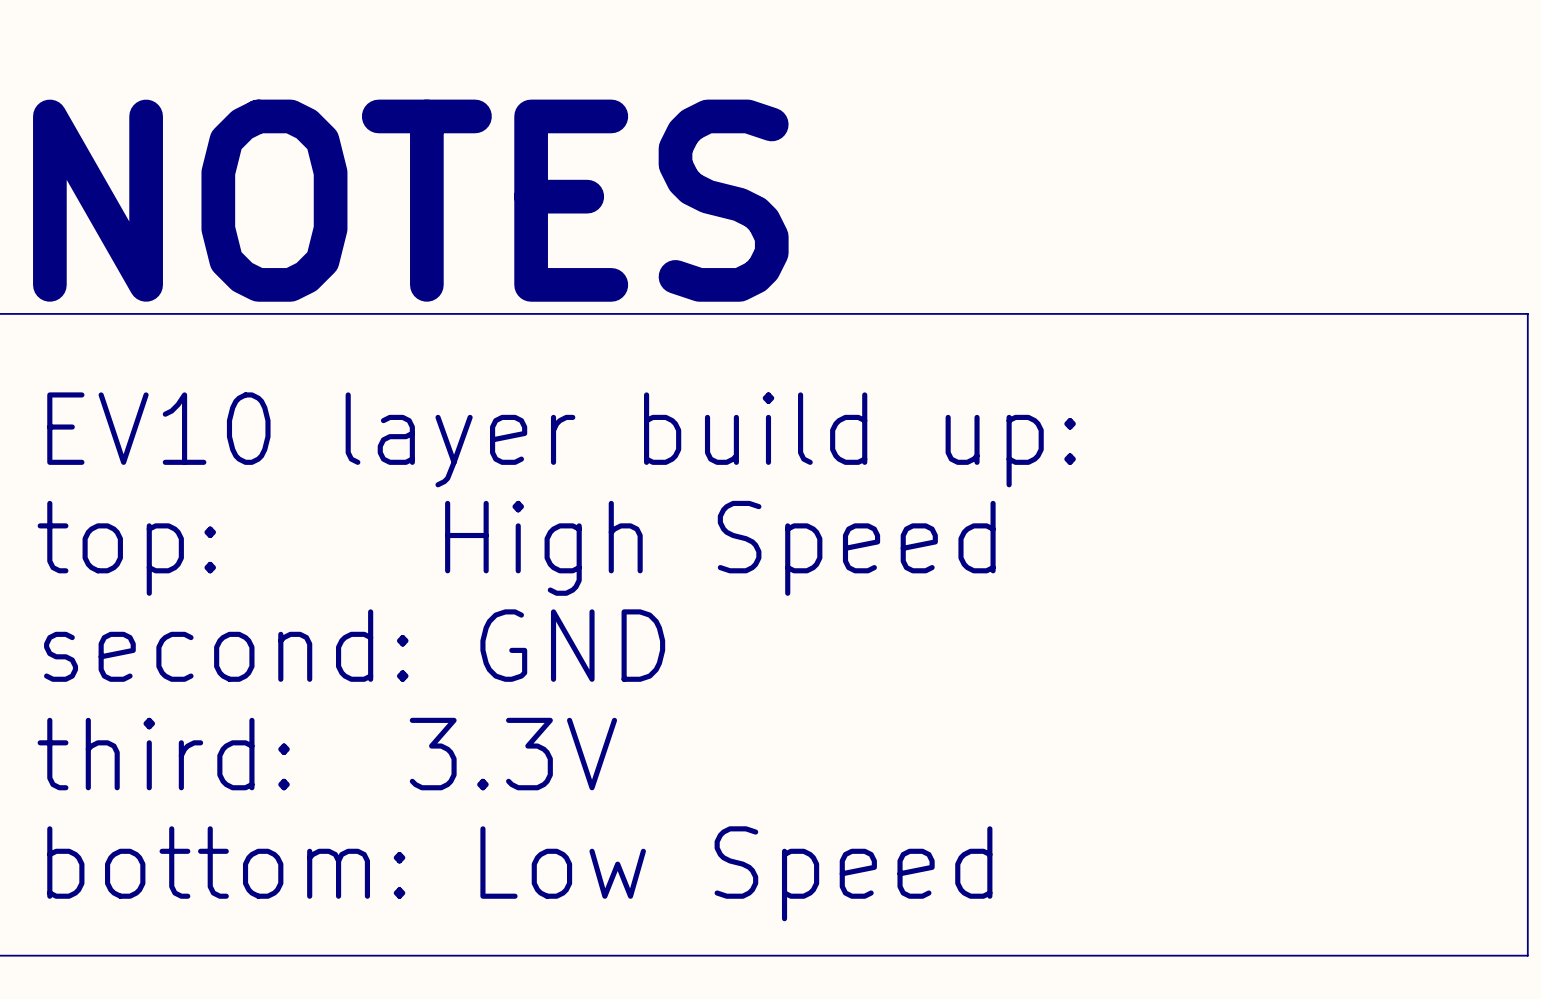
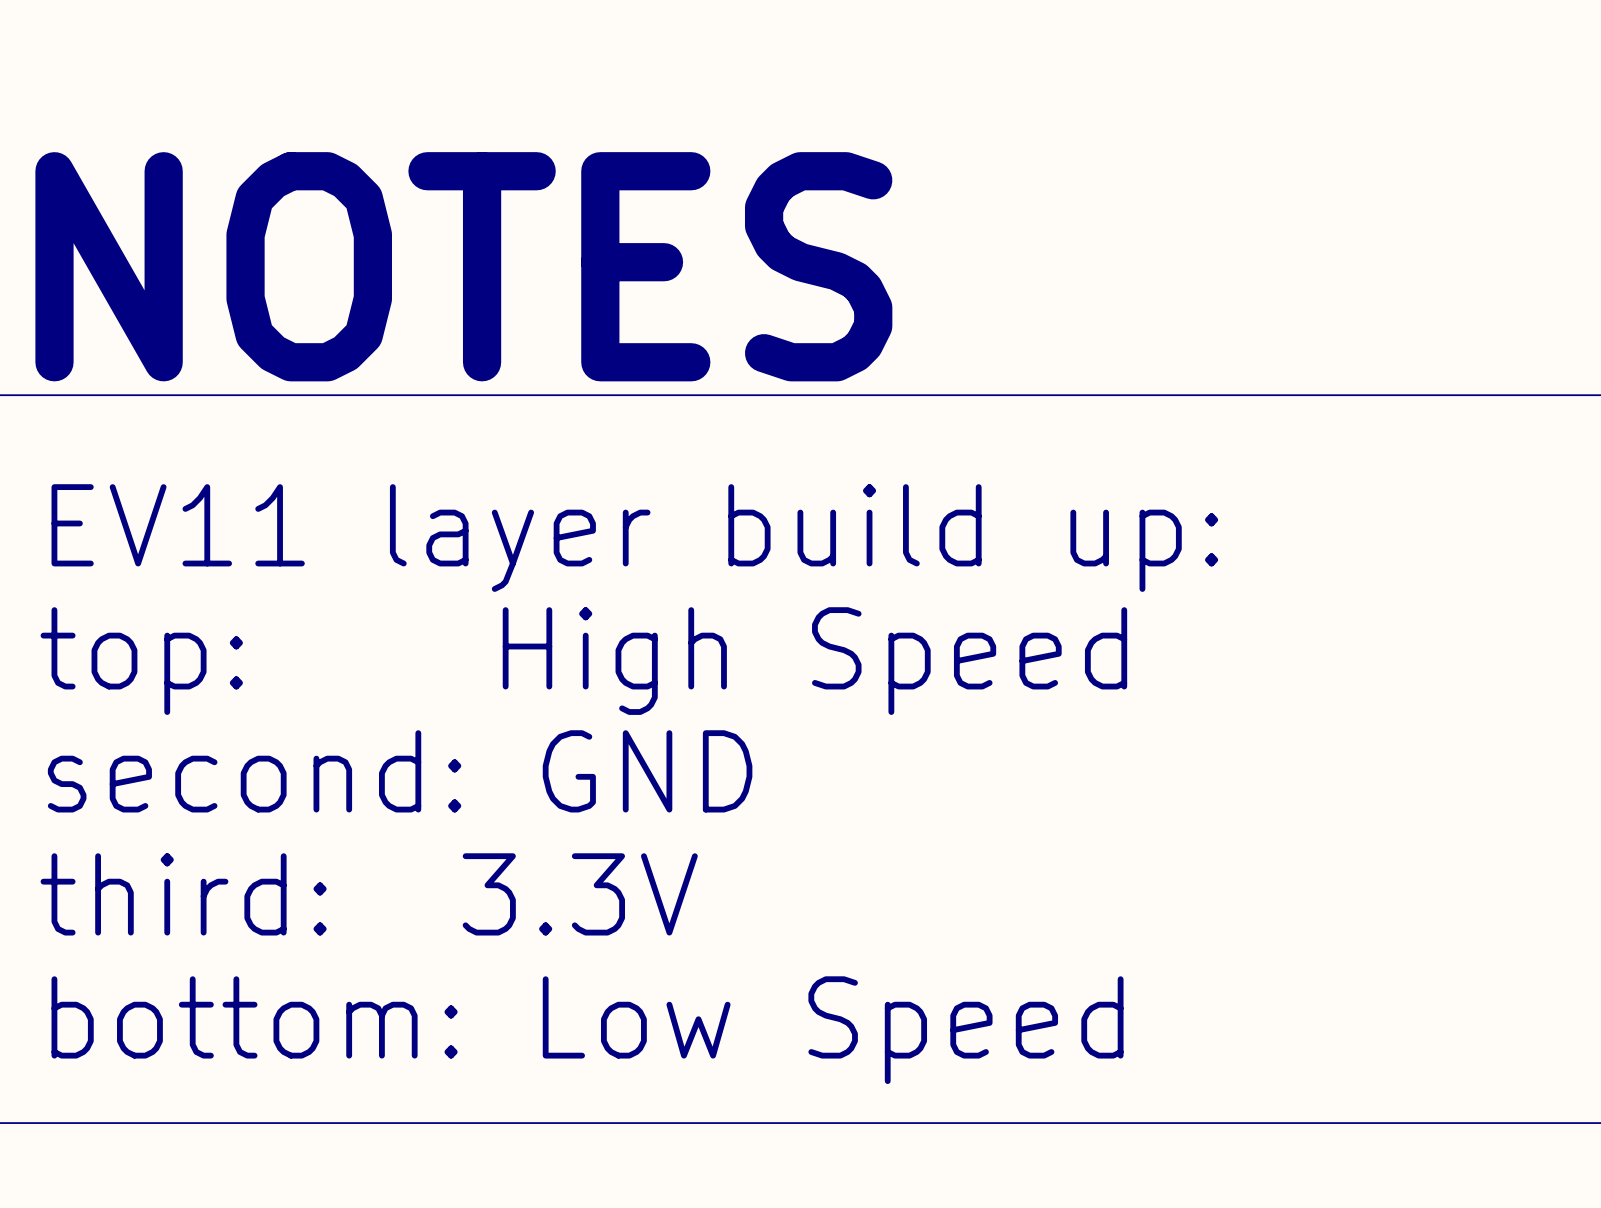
text: EV10 layer build up: (561, 439) -> EV11 layer build up: (634, 538)

